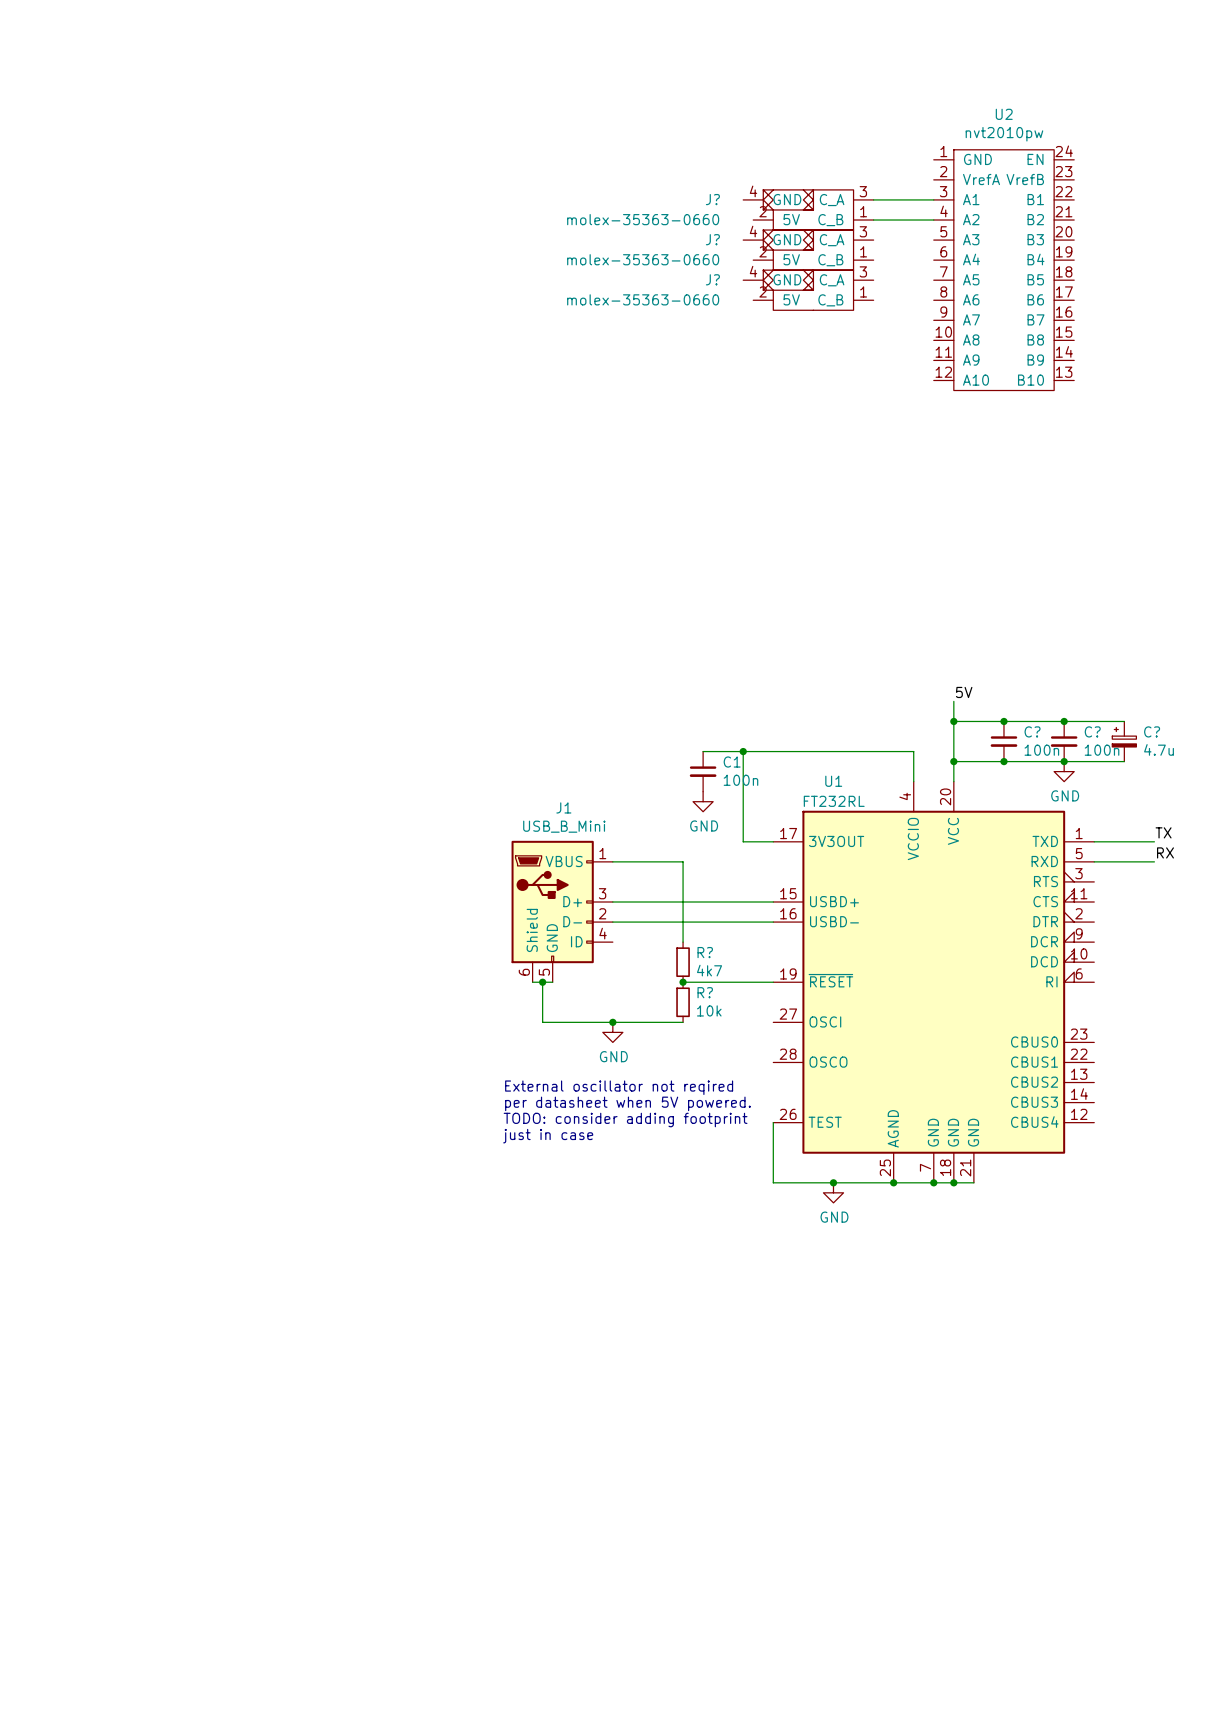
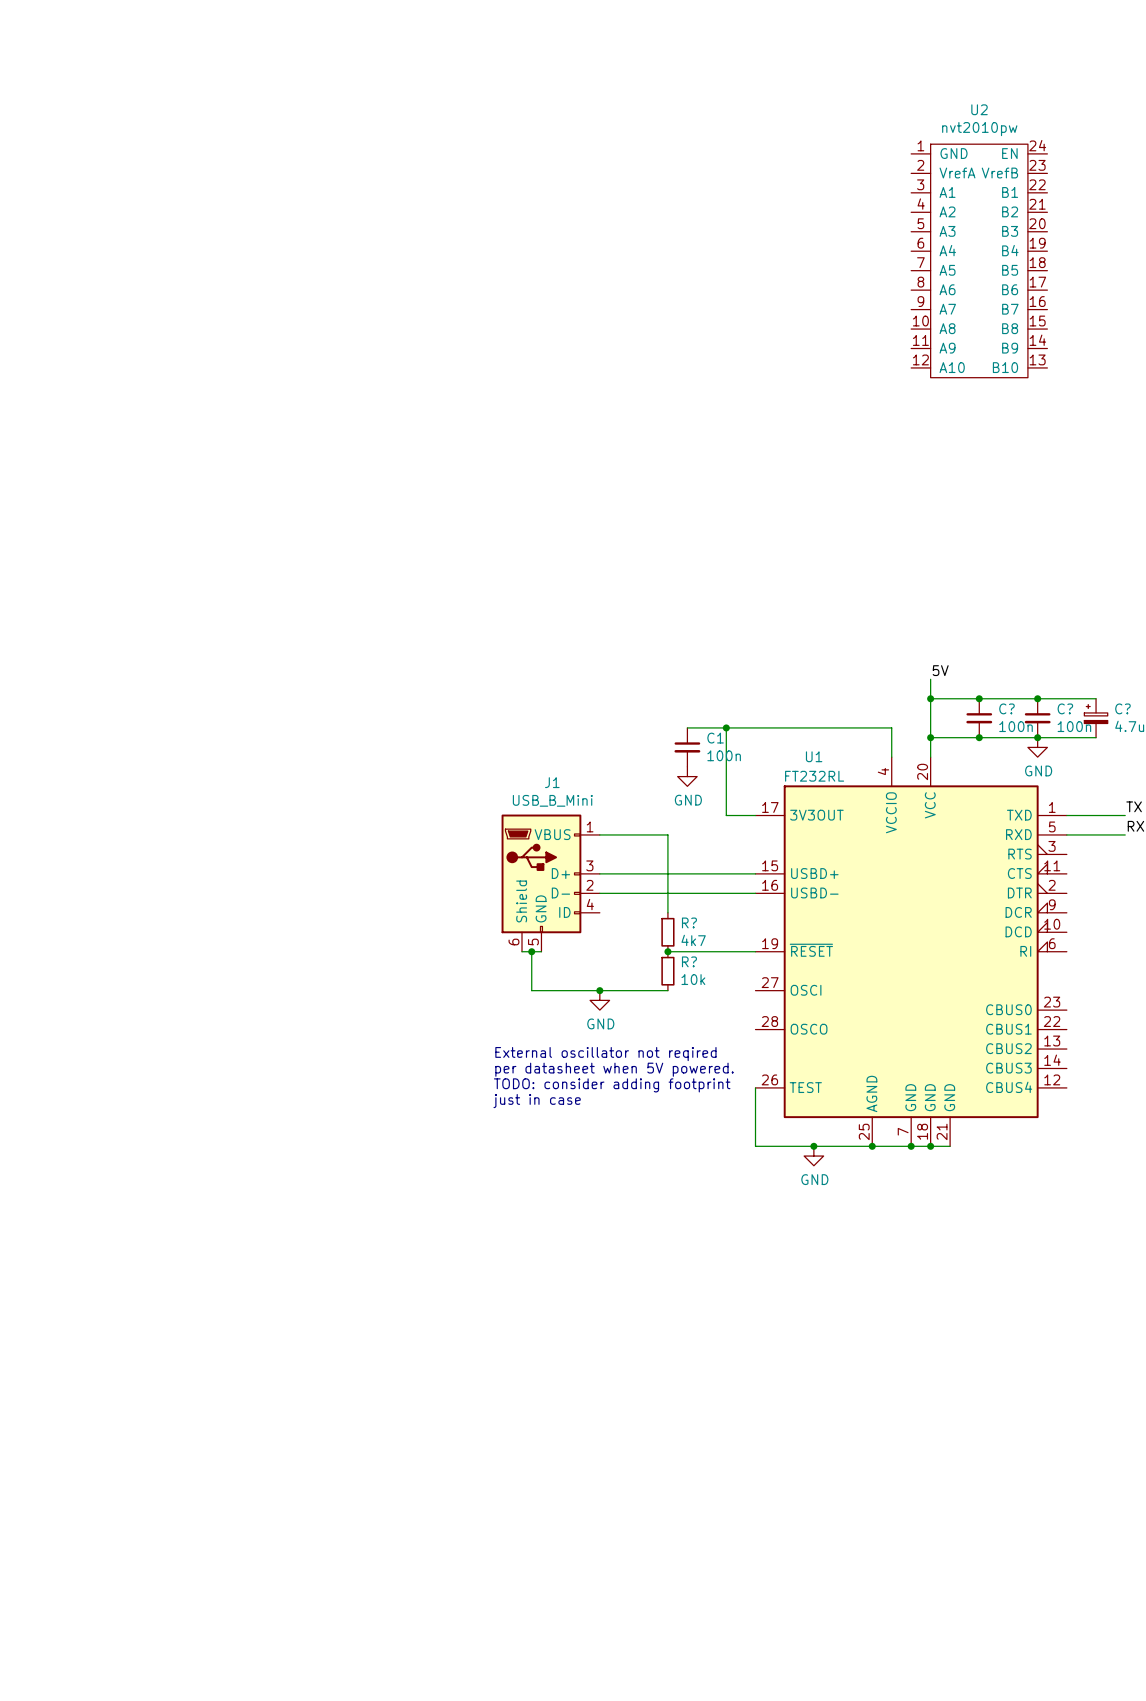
J?: molex-35363-0660 (808, 194) -> none
wire: (873, 199) (933, 199) -> none
wire: (873, 220) (933, 220) -> none
J?: molex-35363-0660 (808, 235) -> none
J?: molex-35363-0660 (808, 275) -> none

